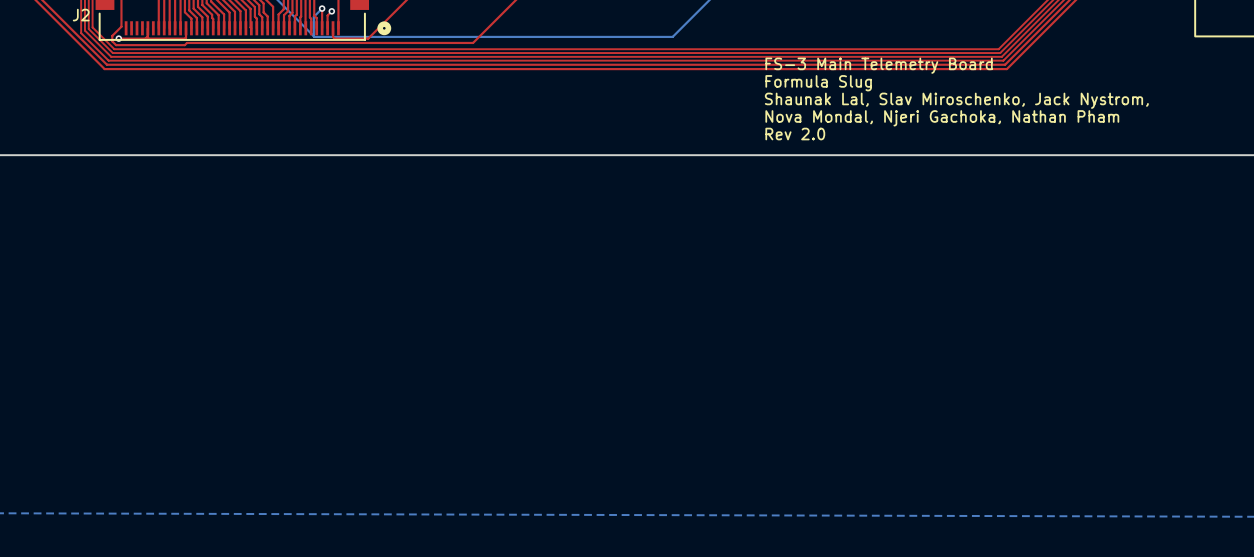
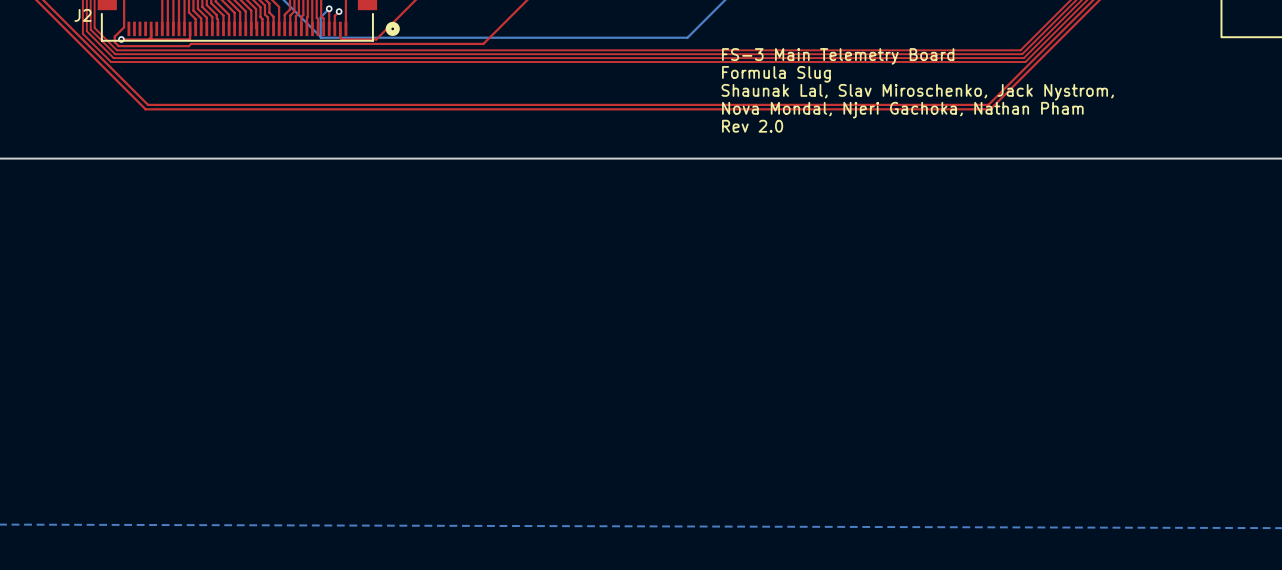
top track: (106, 64) (1005, 64) -> (109, 66) (148, 104) (988, 104) (1027, 66)
text position: FS-3 Main Telemetry Board (879, 65) -> FS-3 Main Telemetry Board (838, 56)
top track: (104, 69) (1006, 69) -> (106, 70) (145, 109) (990, 109) (1029, 70)
text position: Formula Slug (818, 83) -> Formula Slug (776, 74)
text position: Shaunak Lal, Slav Miroschenko, Jack Nystrom, (956, 100) -> Shaunak Lal, Slav Miroschenko, Jack Nystrom, (917, 92)
text position: Nova Mondal, Njeri Gachoka, Nathan Pham (942, 118) -> Nova Mondal, Njeri Gachoka, Nathan Pham (902, 110)
text position: Rev 2.0 (795, 134) -> Rev 2.0 (752, 126)

